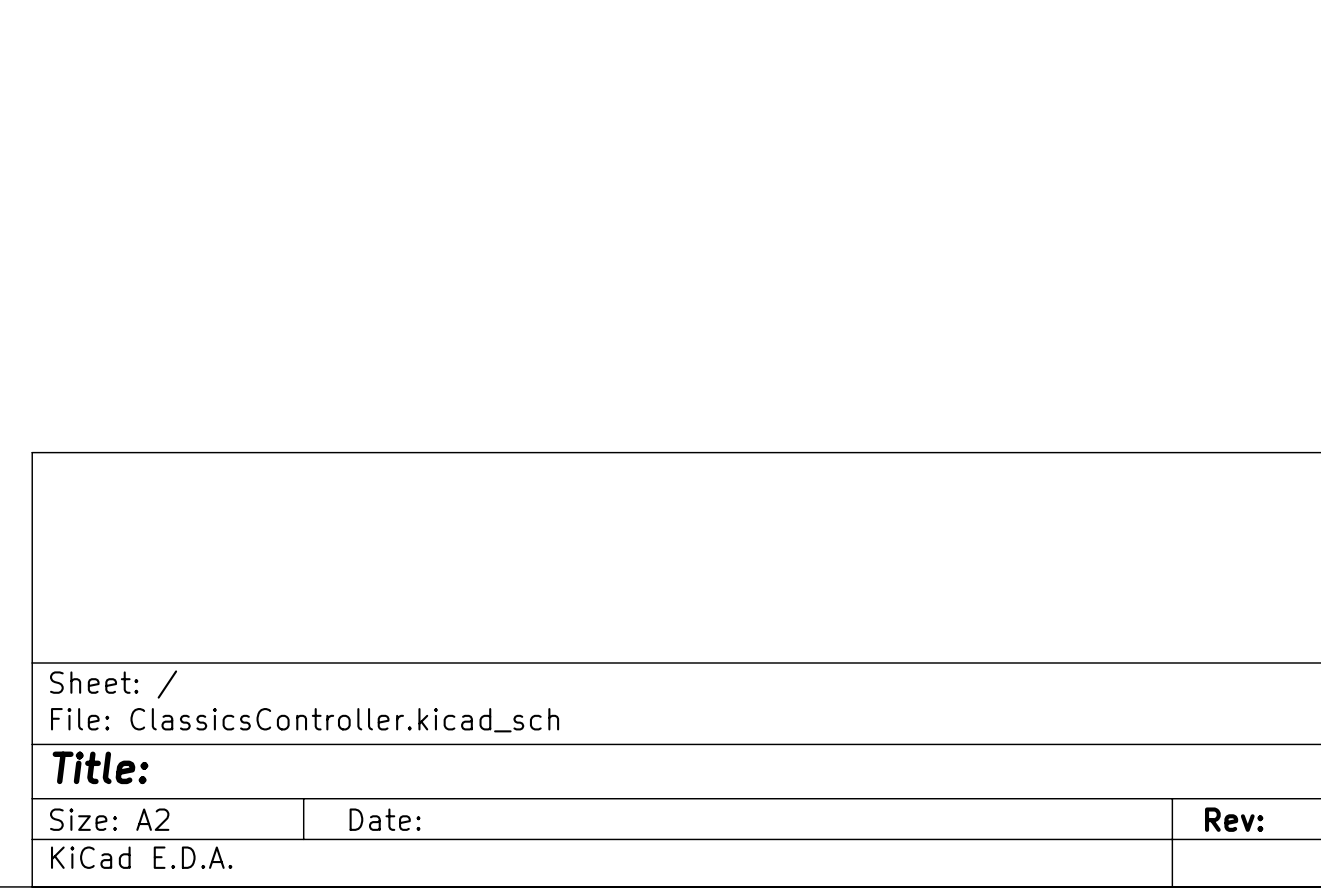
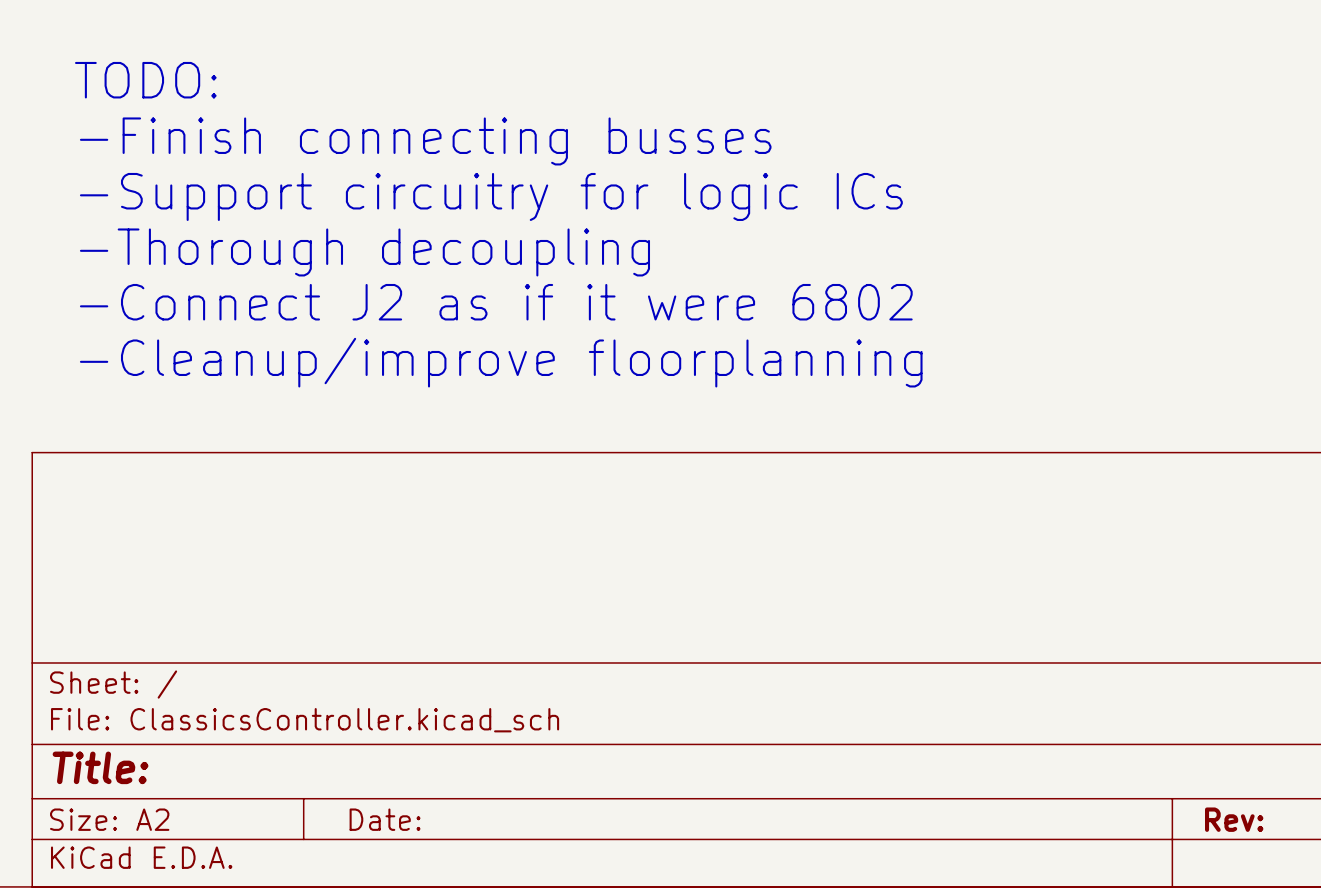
text: none -> TODO: (145, 80)
text: none -> -Finish connecting busses (425, 141)
text: none -> -Support circuitry for logic ICs (491, 196)
text: none -> -Thorough decoupling (364, 252)
text: none -> -Connect J2 as if it were 6802 (496, 302)
text: none -> -Cleanup/improve floorplanning (501, 362)

